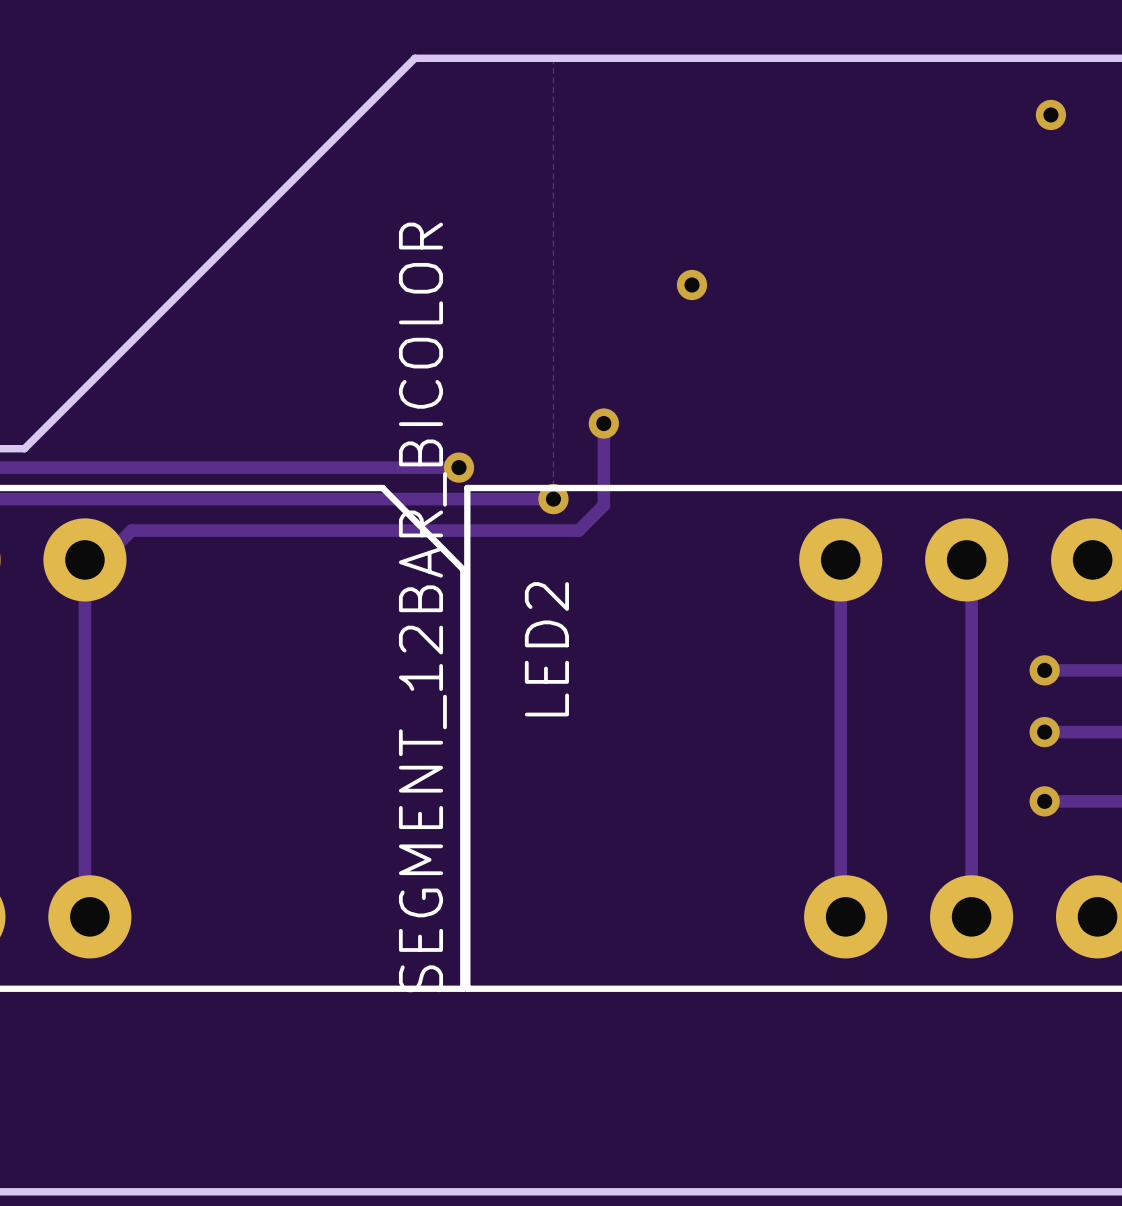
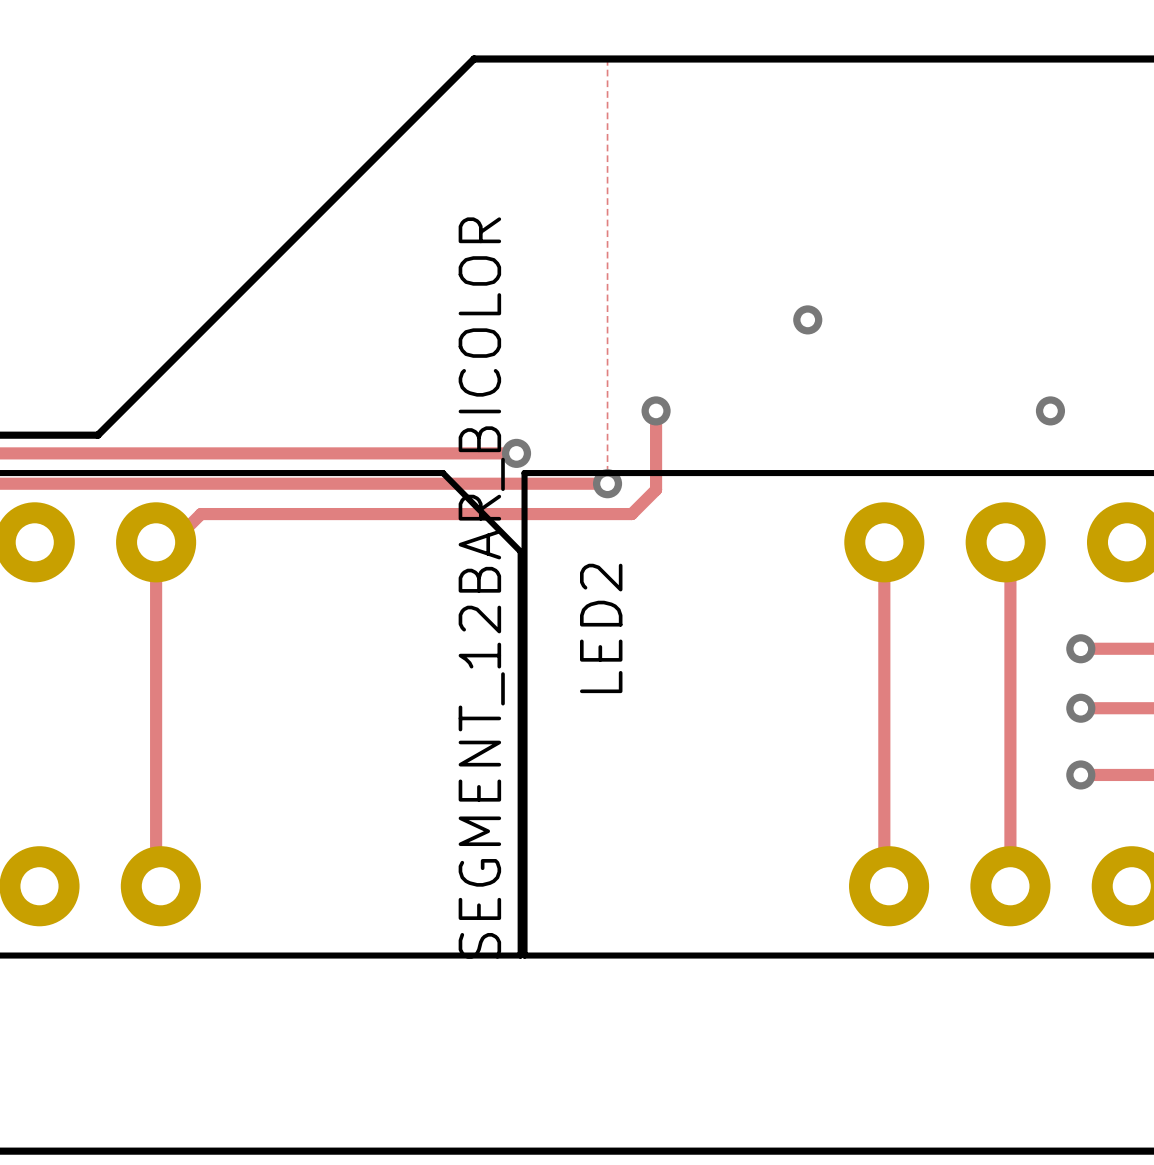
via: (1050, 114) -> none
via position: (692, 284) -> (807, 319)
via: none -> (1050, 410)

